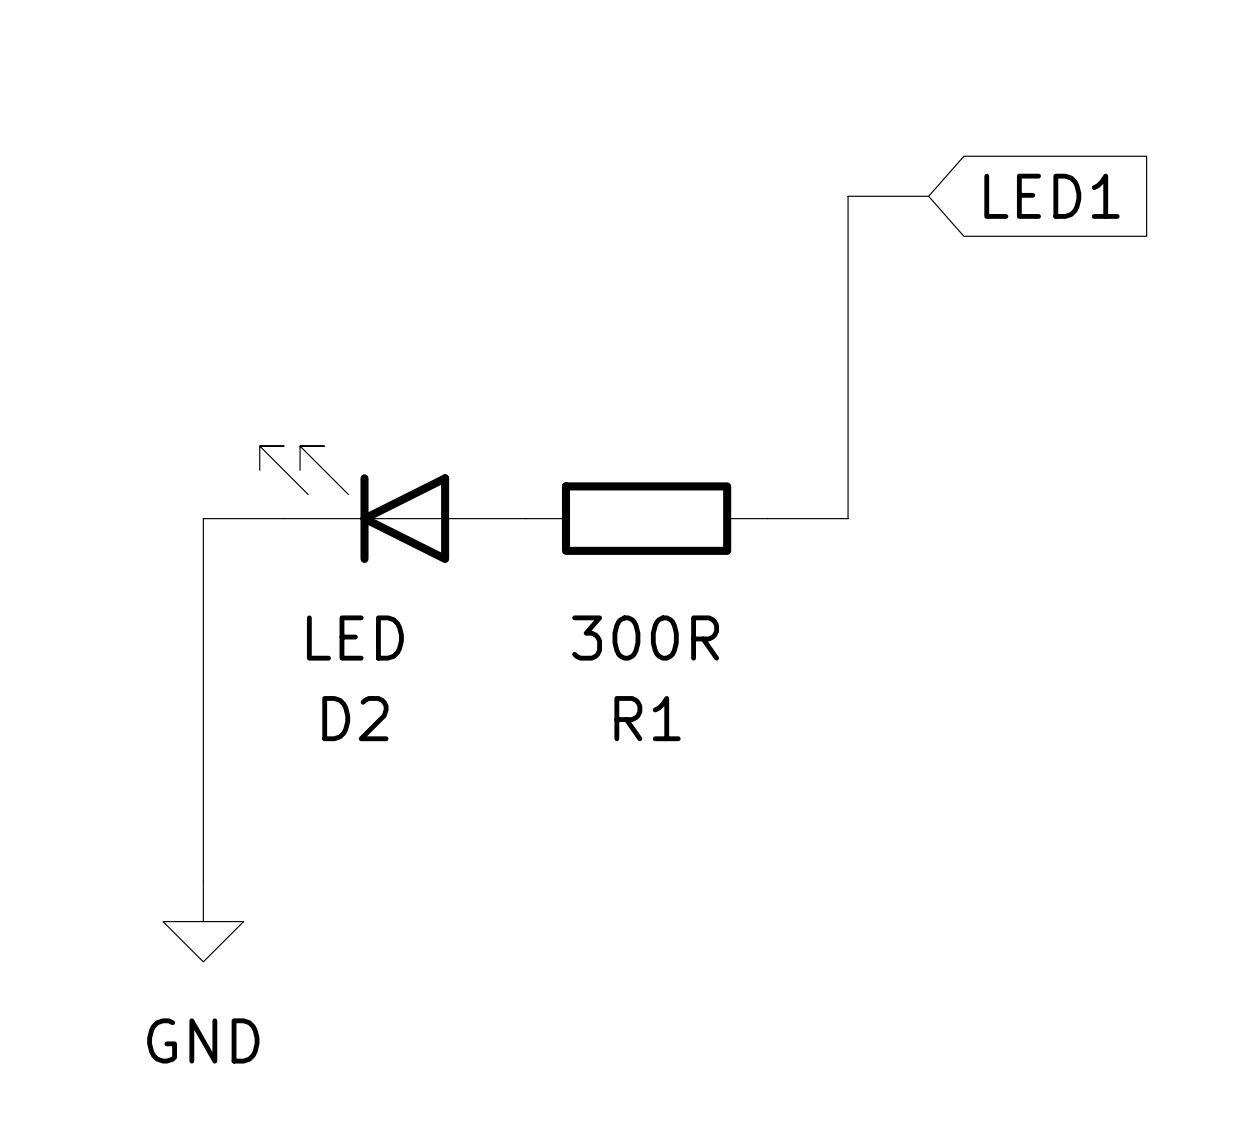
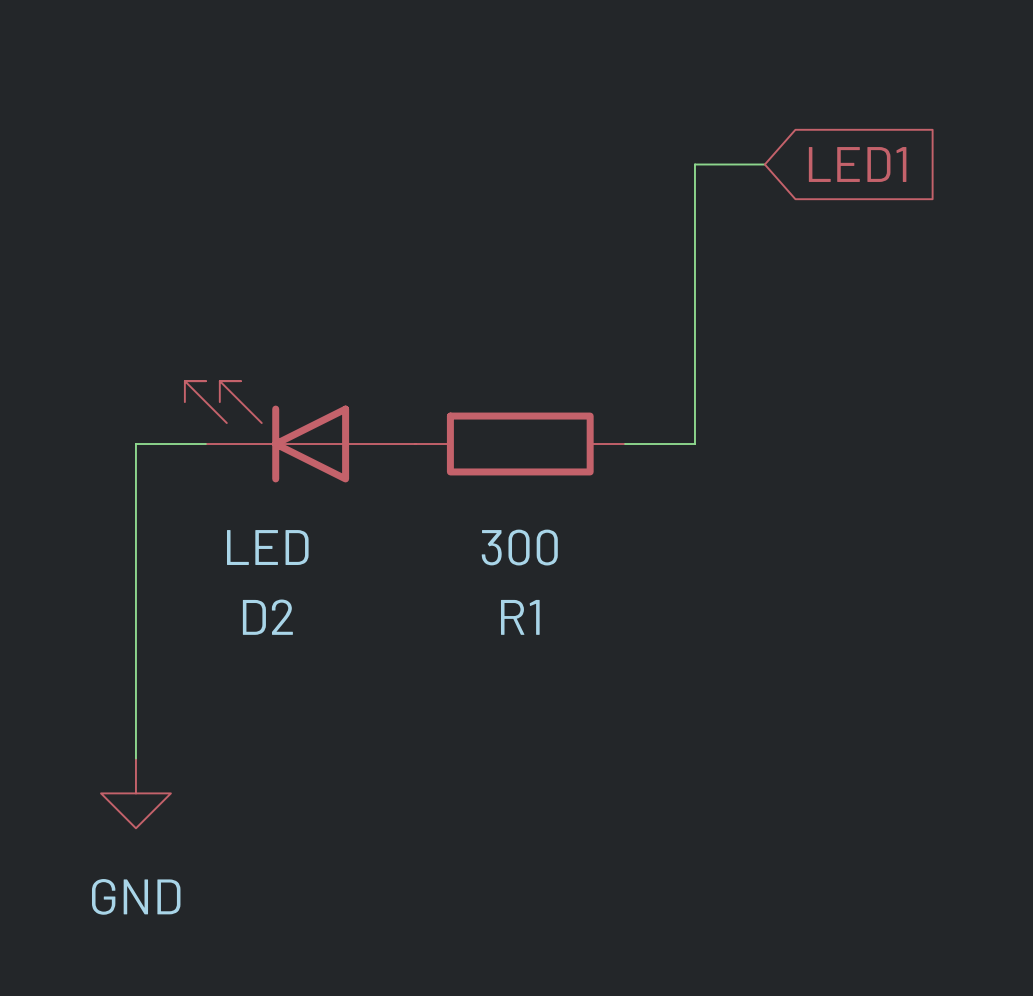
R1 value: 300R (645, 638) -> 300 (519, 547)

